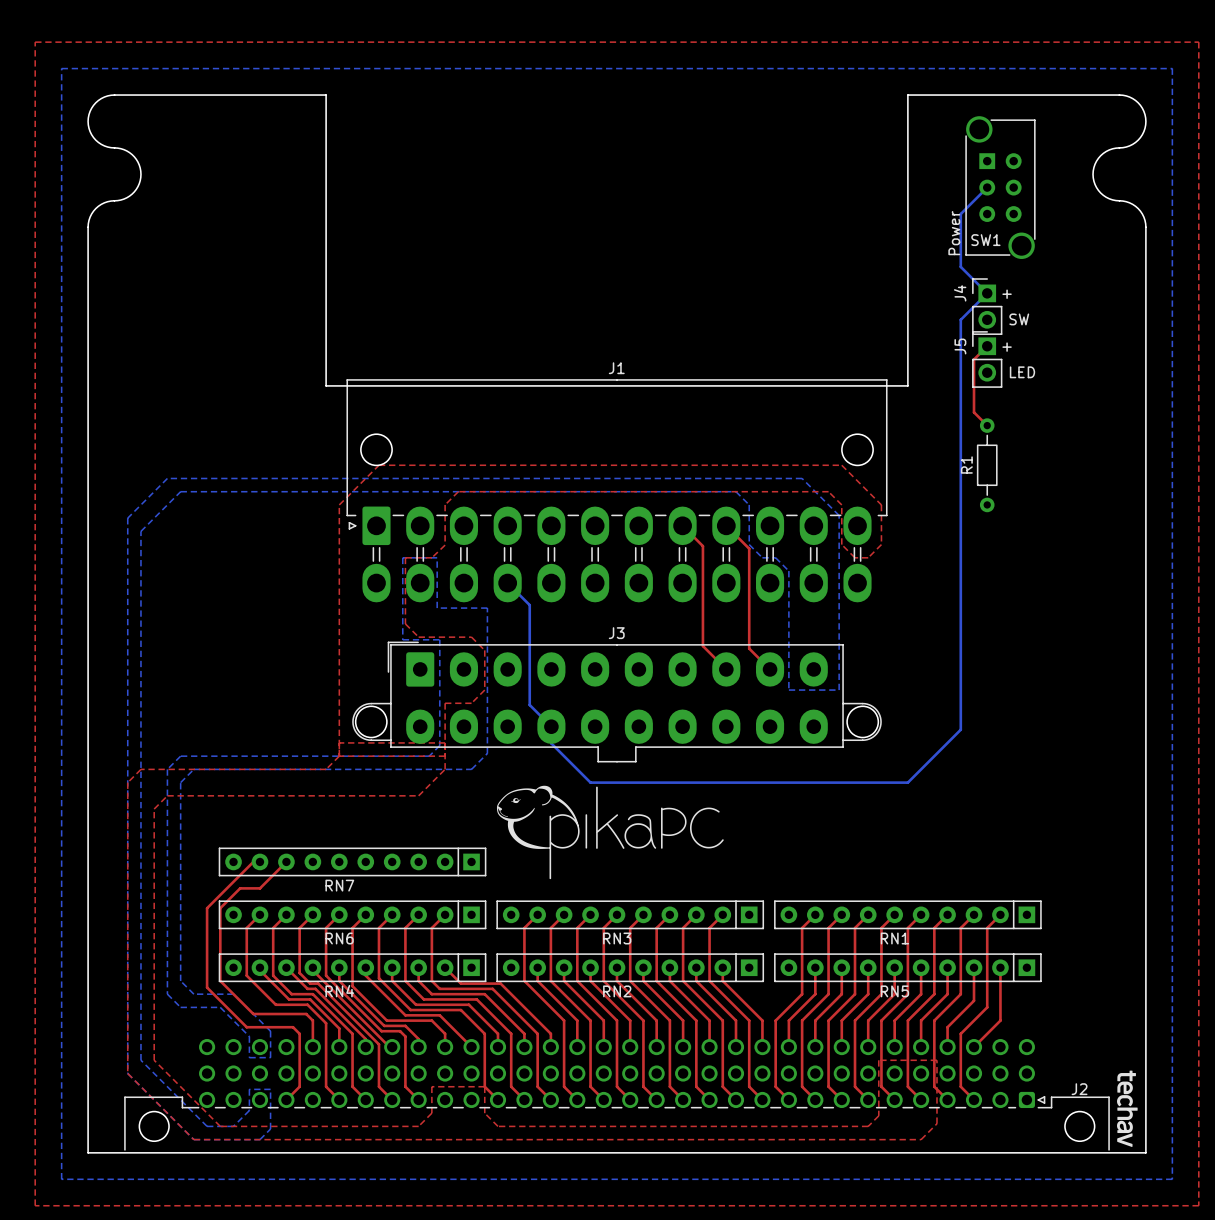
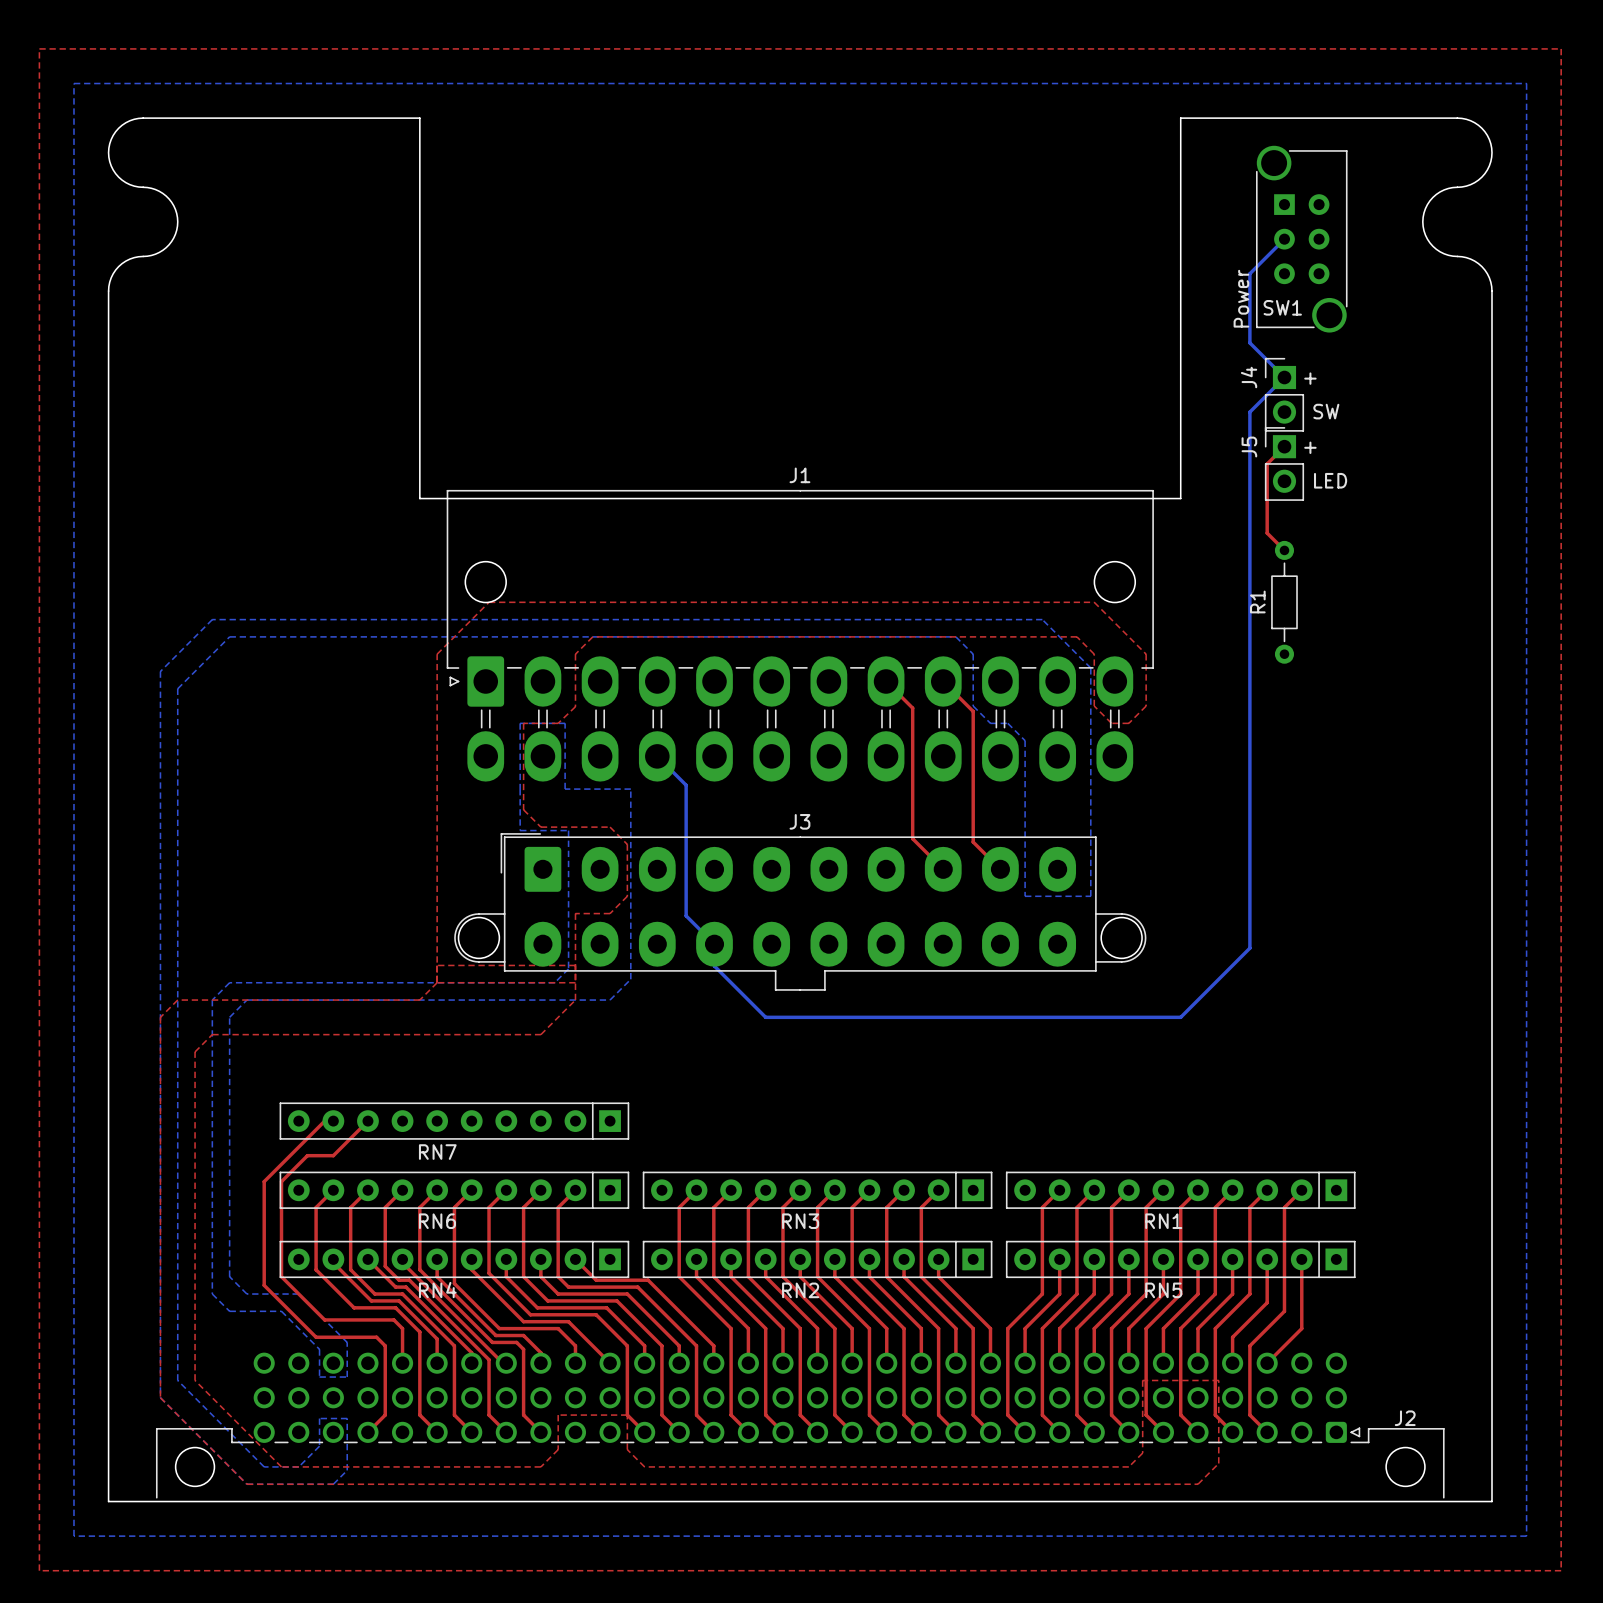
drawing: [496, 785, 724, 880] -> none
drawing: [1117, 1070, 1138, 1147] -> none

